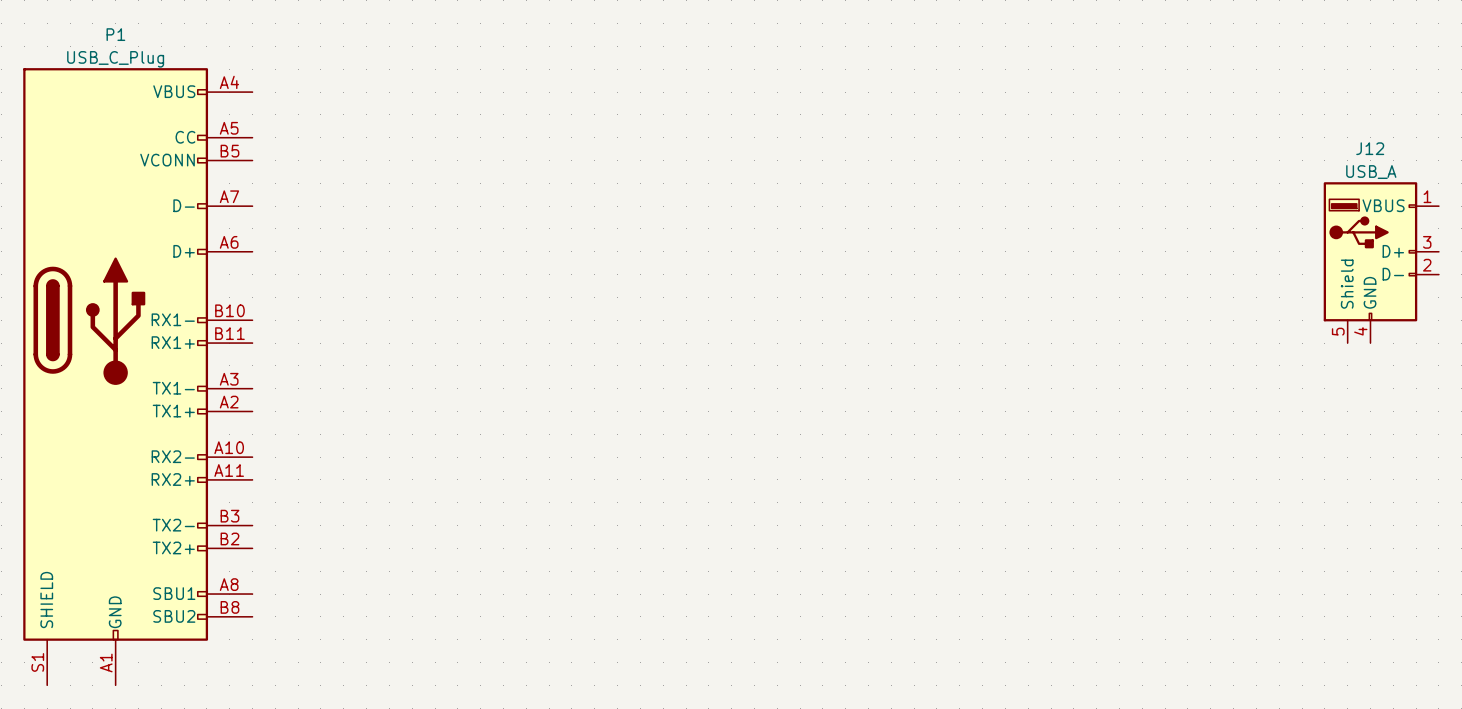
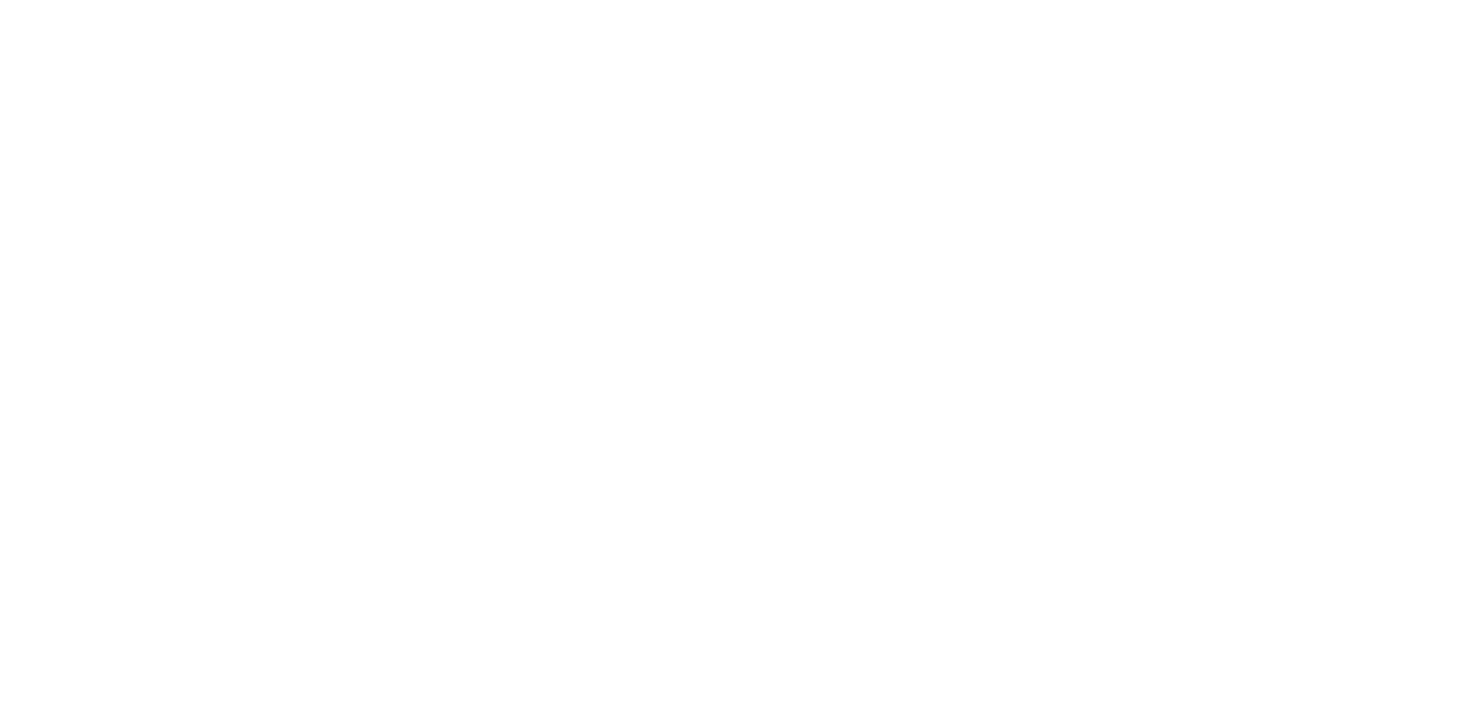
J12: USB_A (1381, 262) -> none
P1: USB_C_Plug (137, 376) -> none

